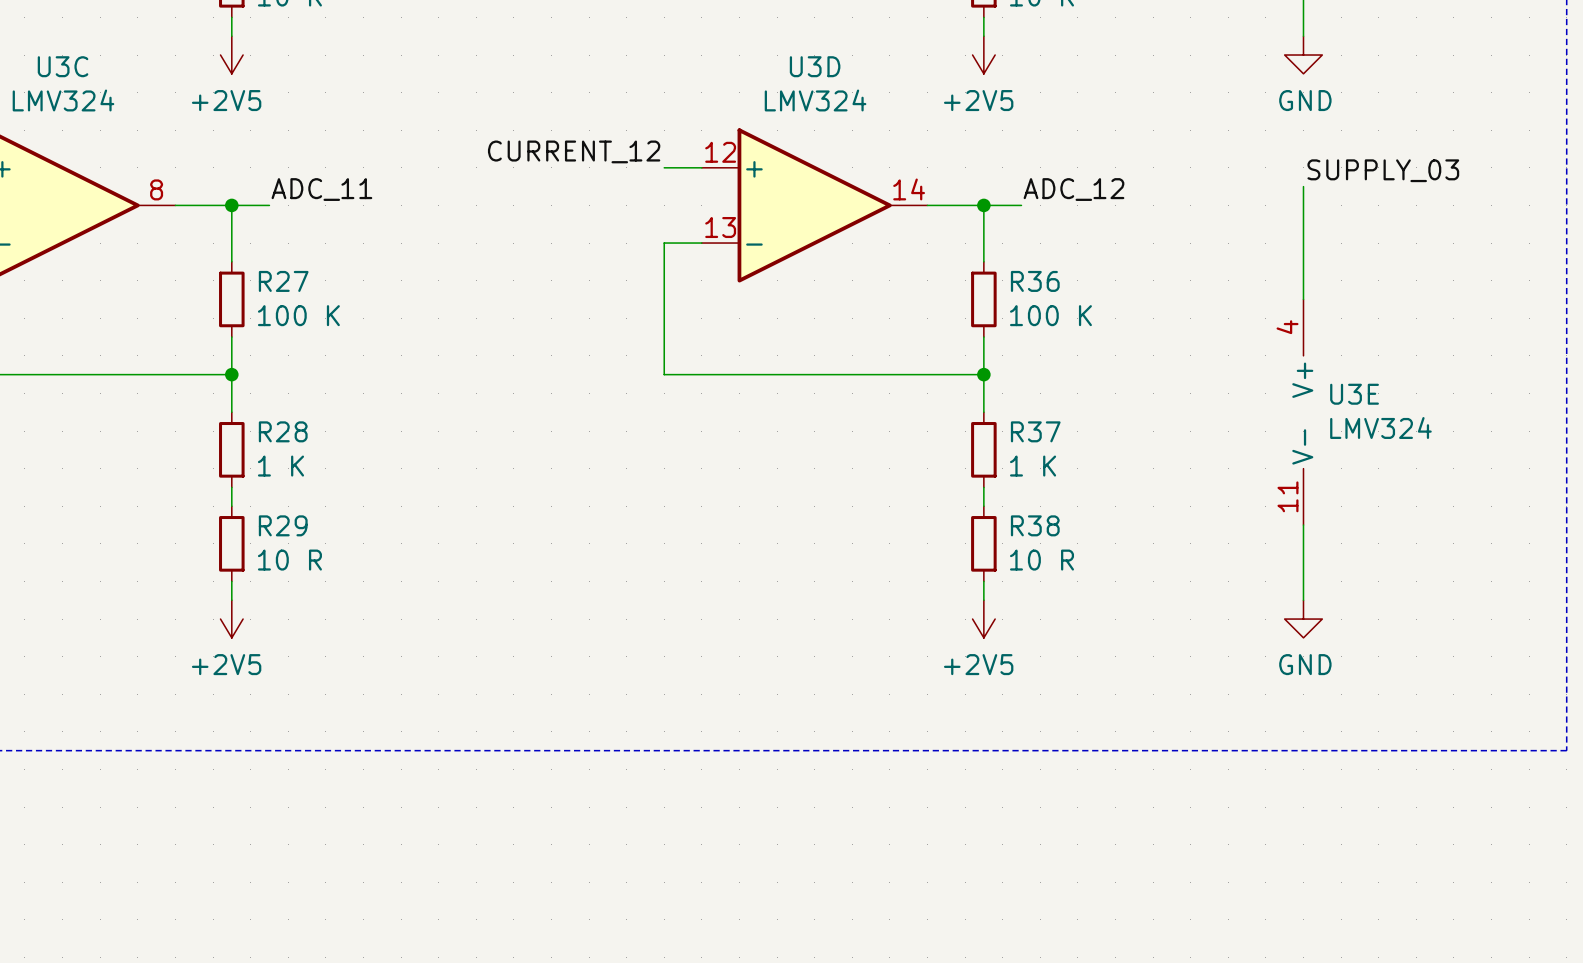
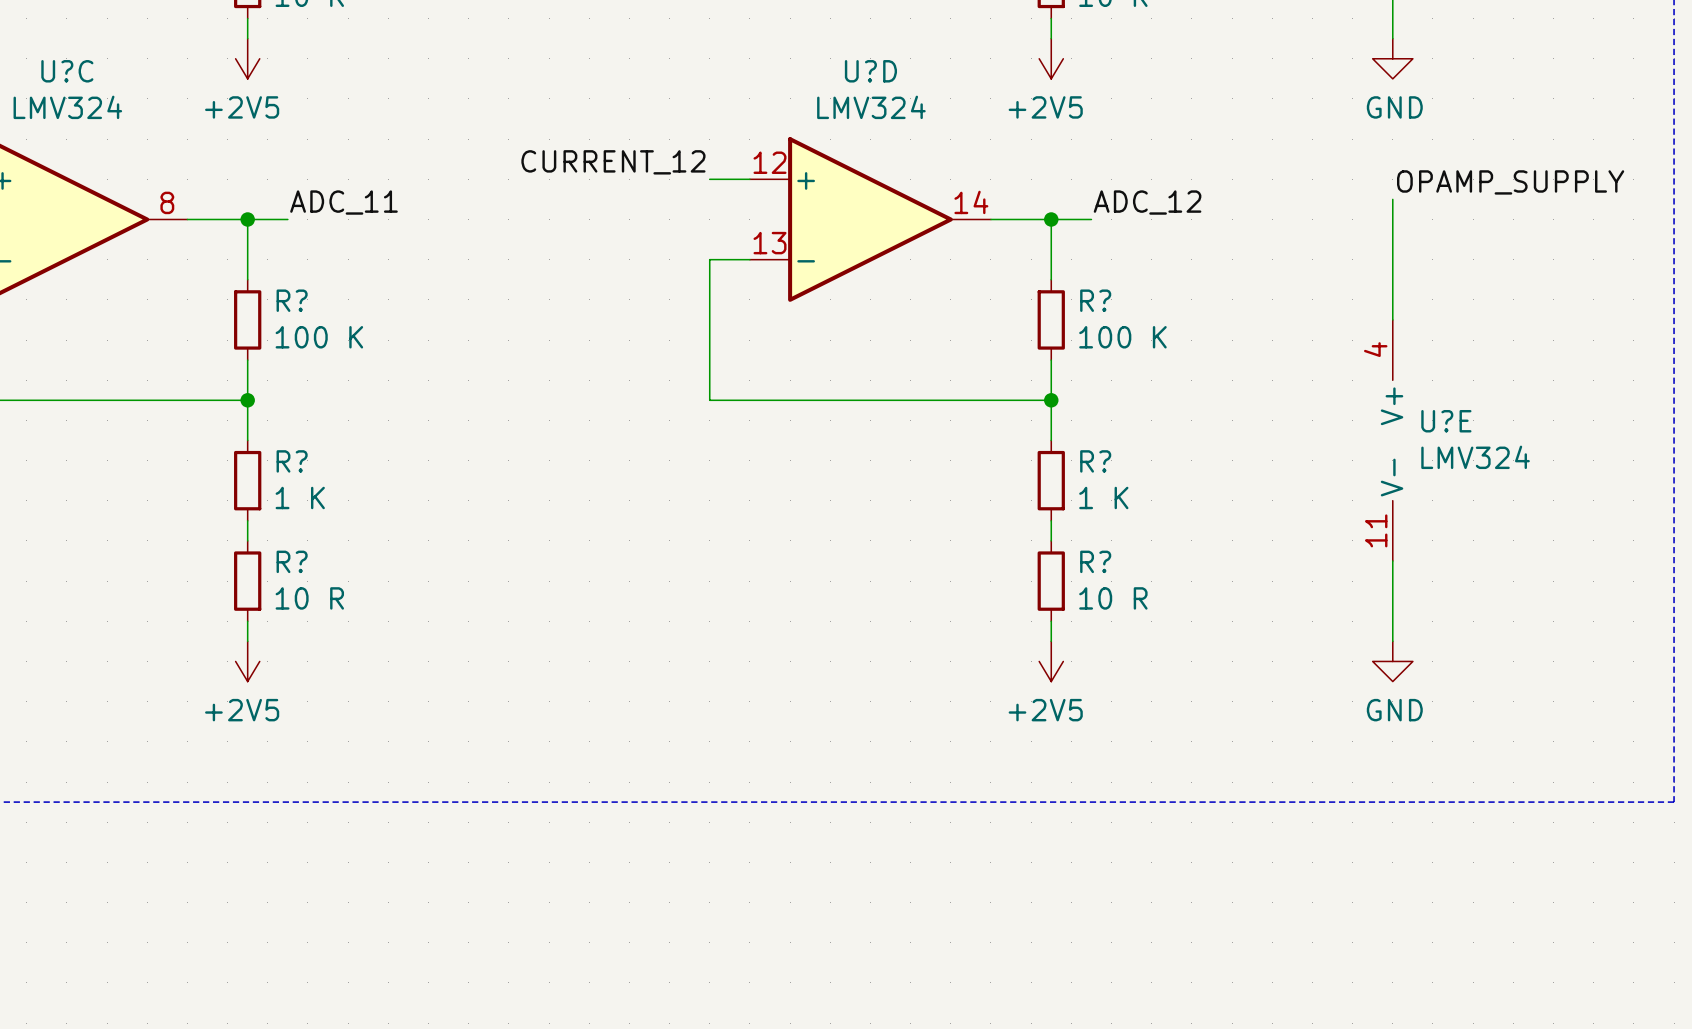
U3C name: U3C (63, 66) -> U?C (67, 71)
U3D name: U3D (815, 66) -> U?D (870, 71)
label: SUPPLY_03 (1383, 170) -> OPAMP_SUPPLY (1510, 182)
R27 name: R27 (283, 281) -> R? (292, 300)
R36 name: R36 (1035, 281) -> R? (1095, 300)
U3E name: U3E (1354, 394) -> U?E (1446, 421)
R28 name: R28 (283, 431) -> R? (292, 461)
R37 name: R37 (1035, 431) -> R? (1095, 461)
R29 name: R29 (283, 525) -> R? (292, 561)
R38 name: R38 (1035, 525) -> R? (1095, 561)

